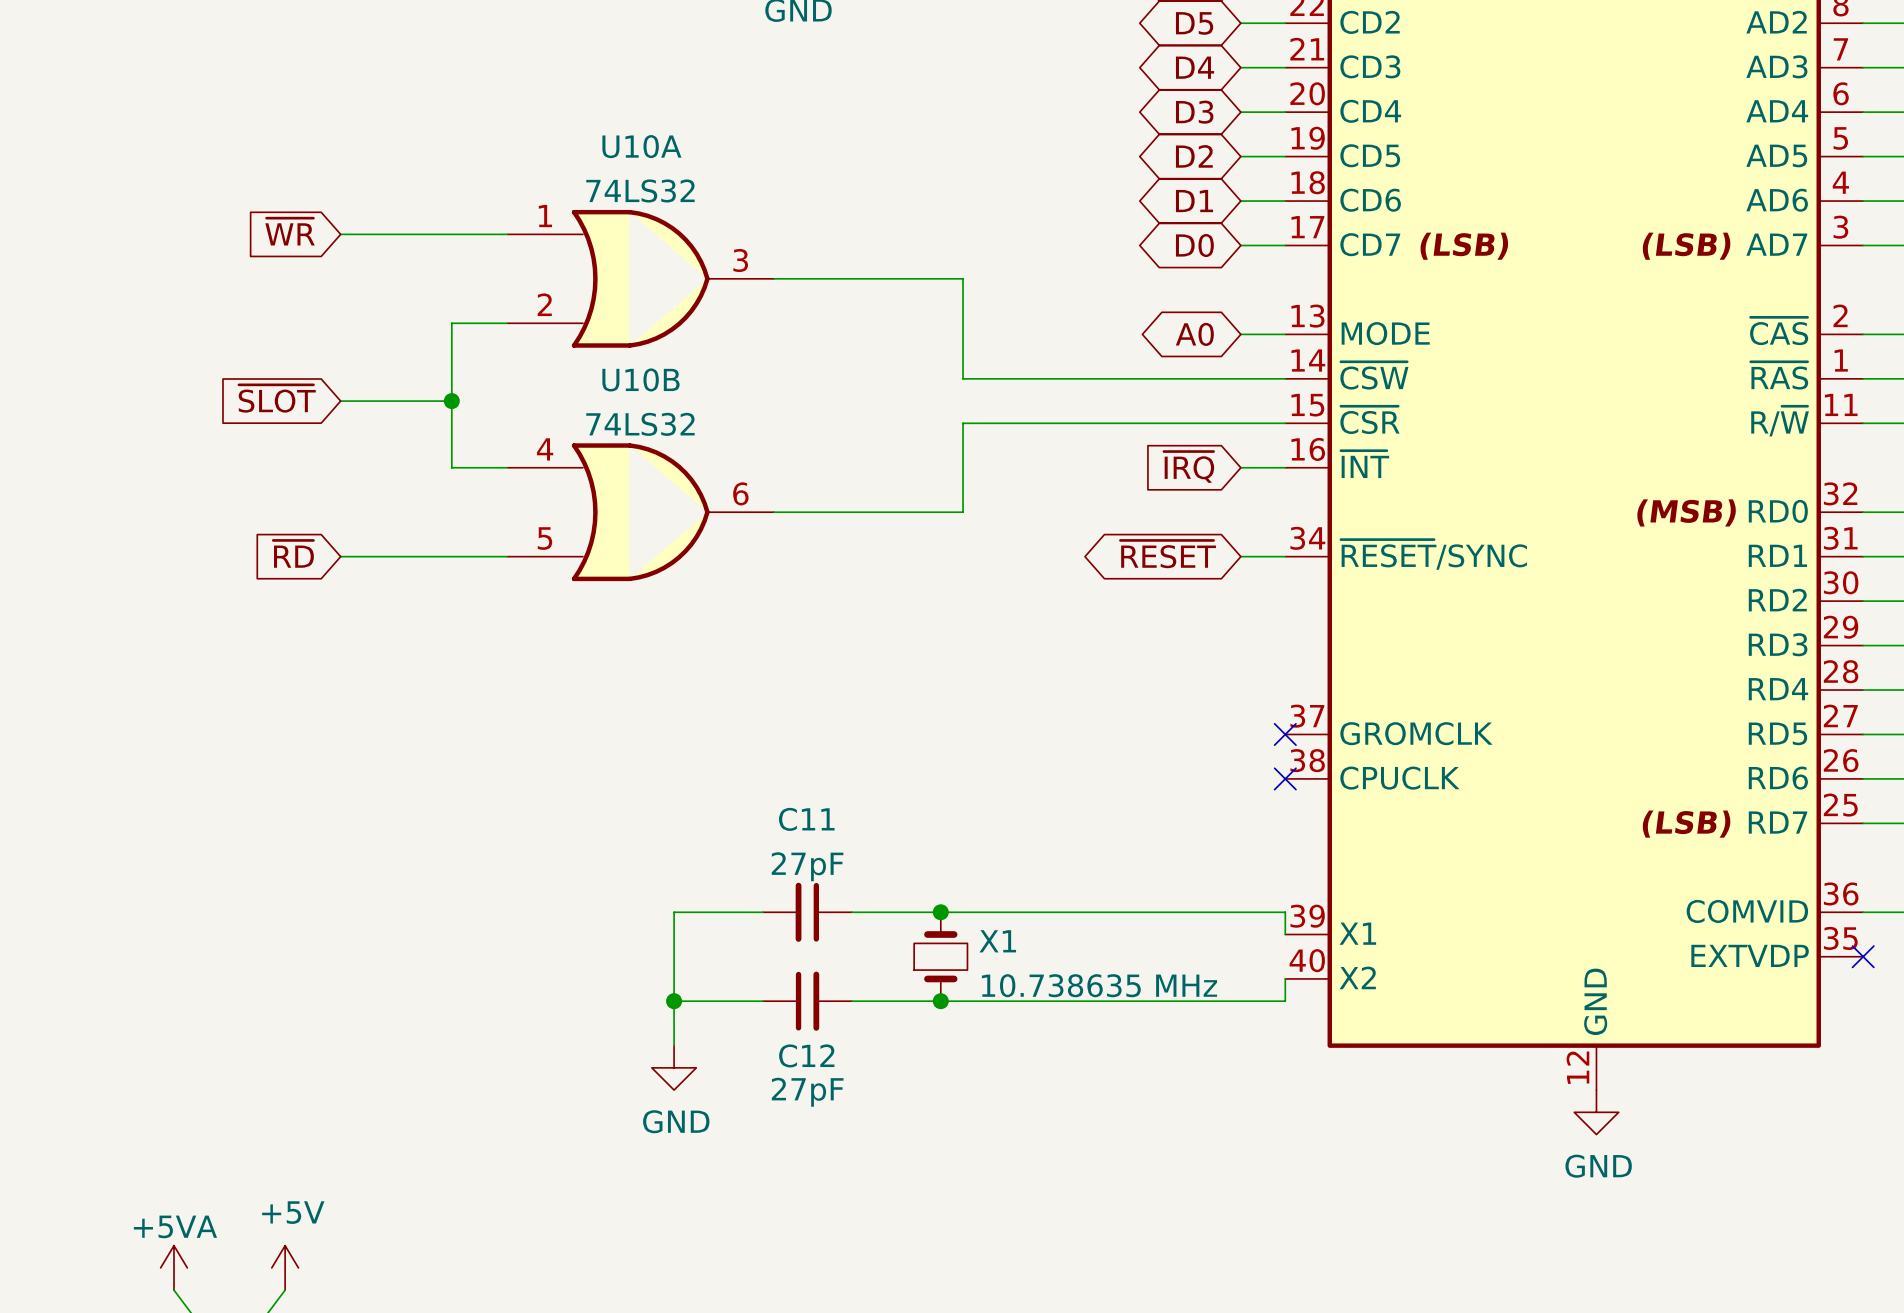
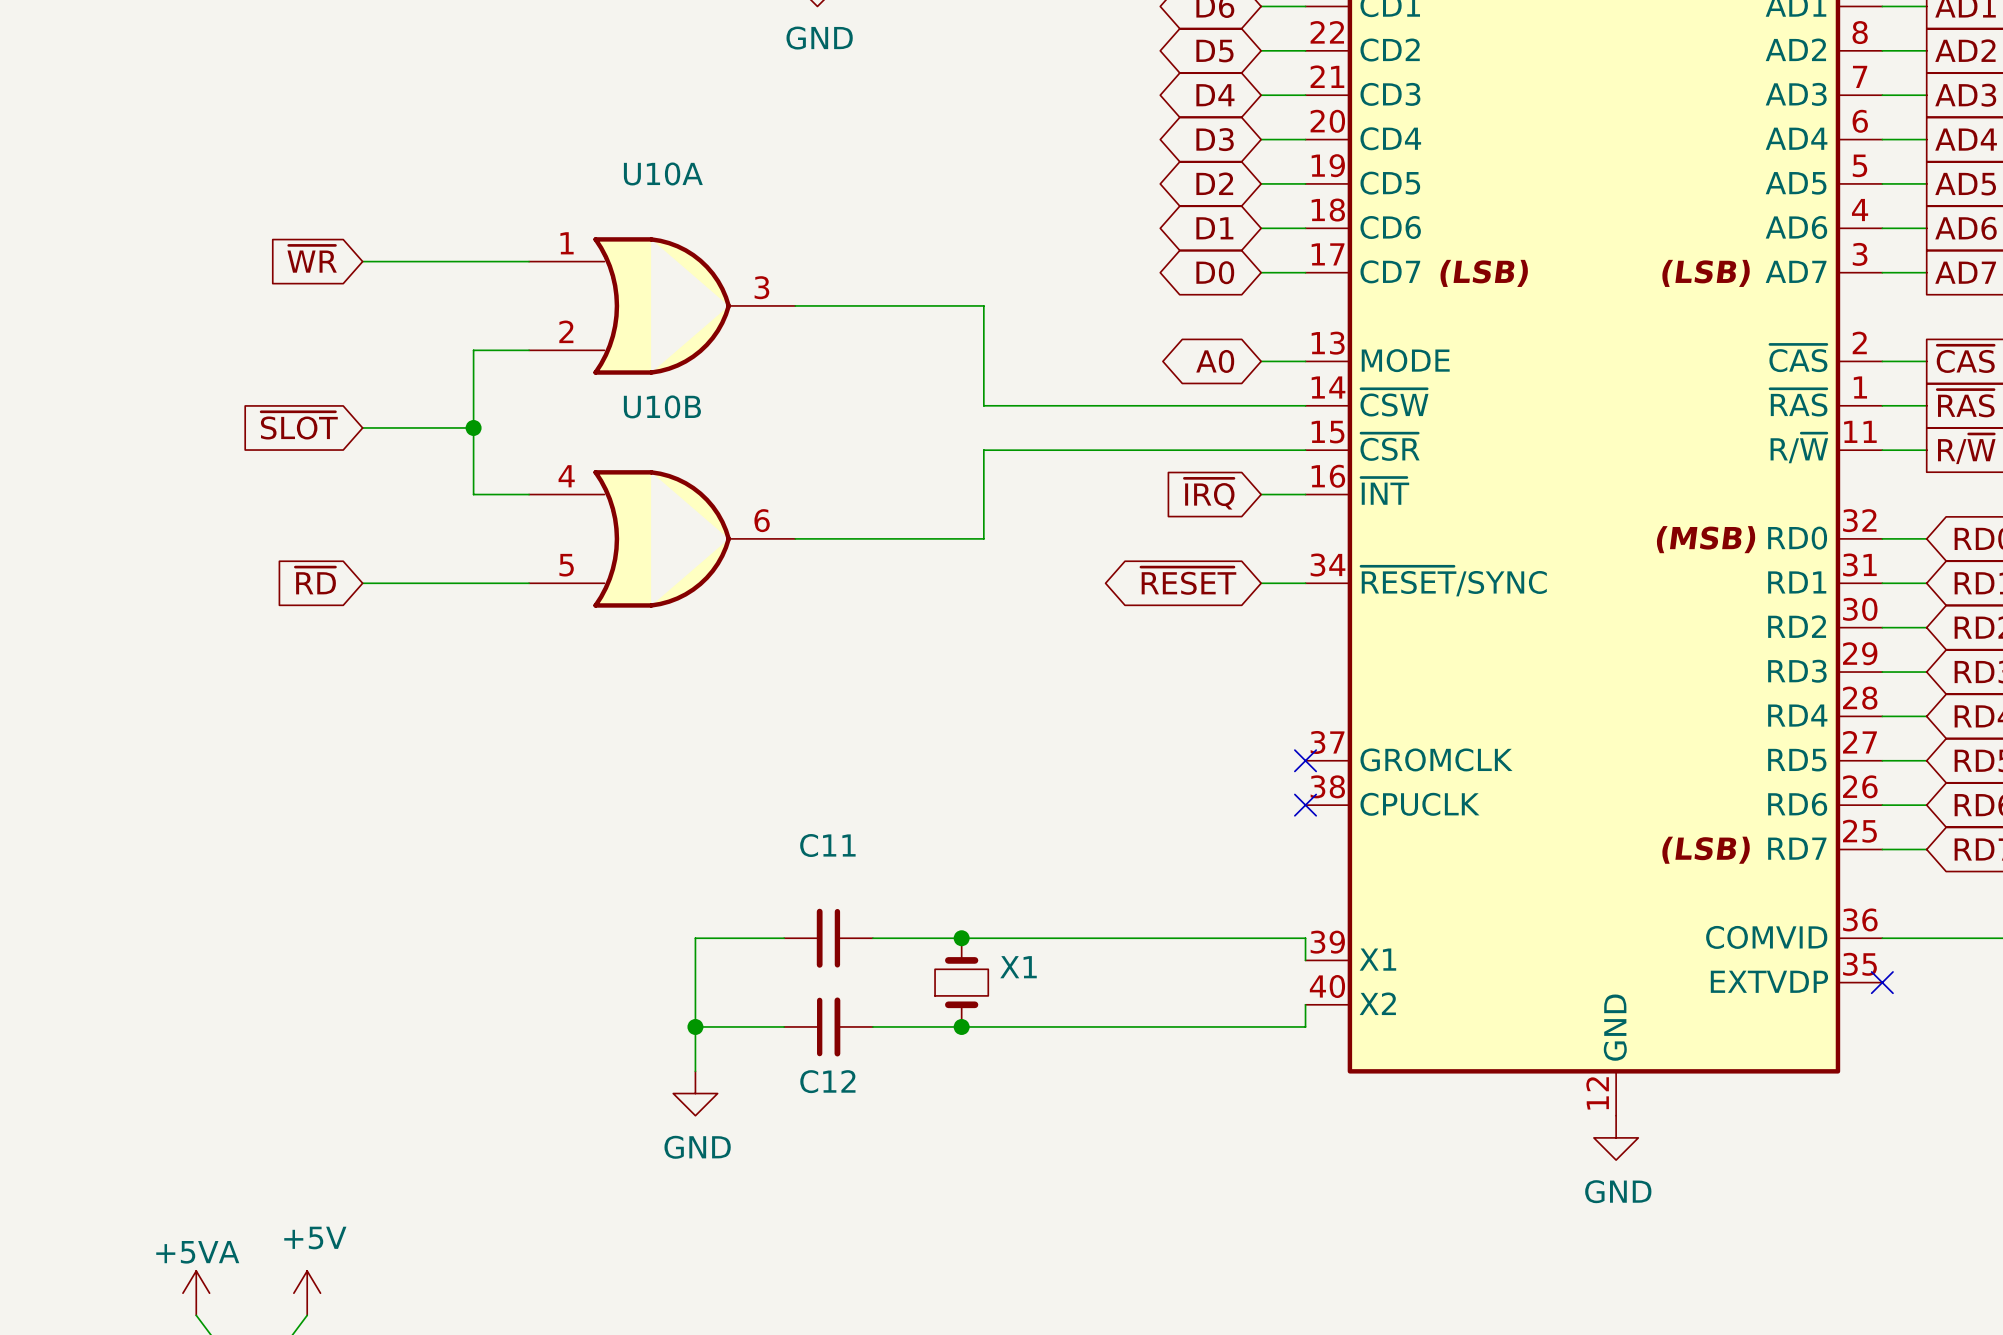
U10A value: 74LS32 (640, 190) -> none
U10B value: 74LS32 (640, 424) -> none
C11 value: 27pF (807, 866) -> none
X1 value: 10.738635 MHz (1099, 985) -> none
C12 value: 27pF (807, 1092) -> none

